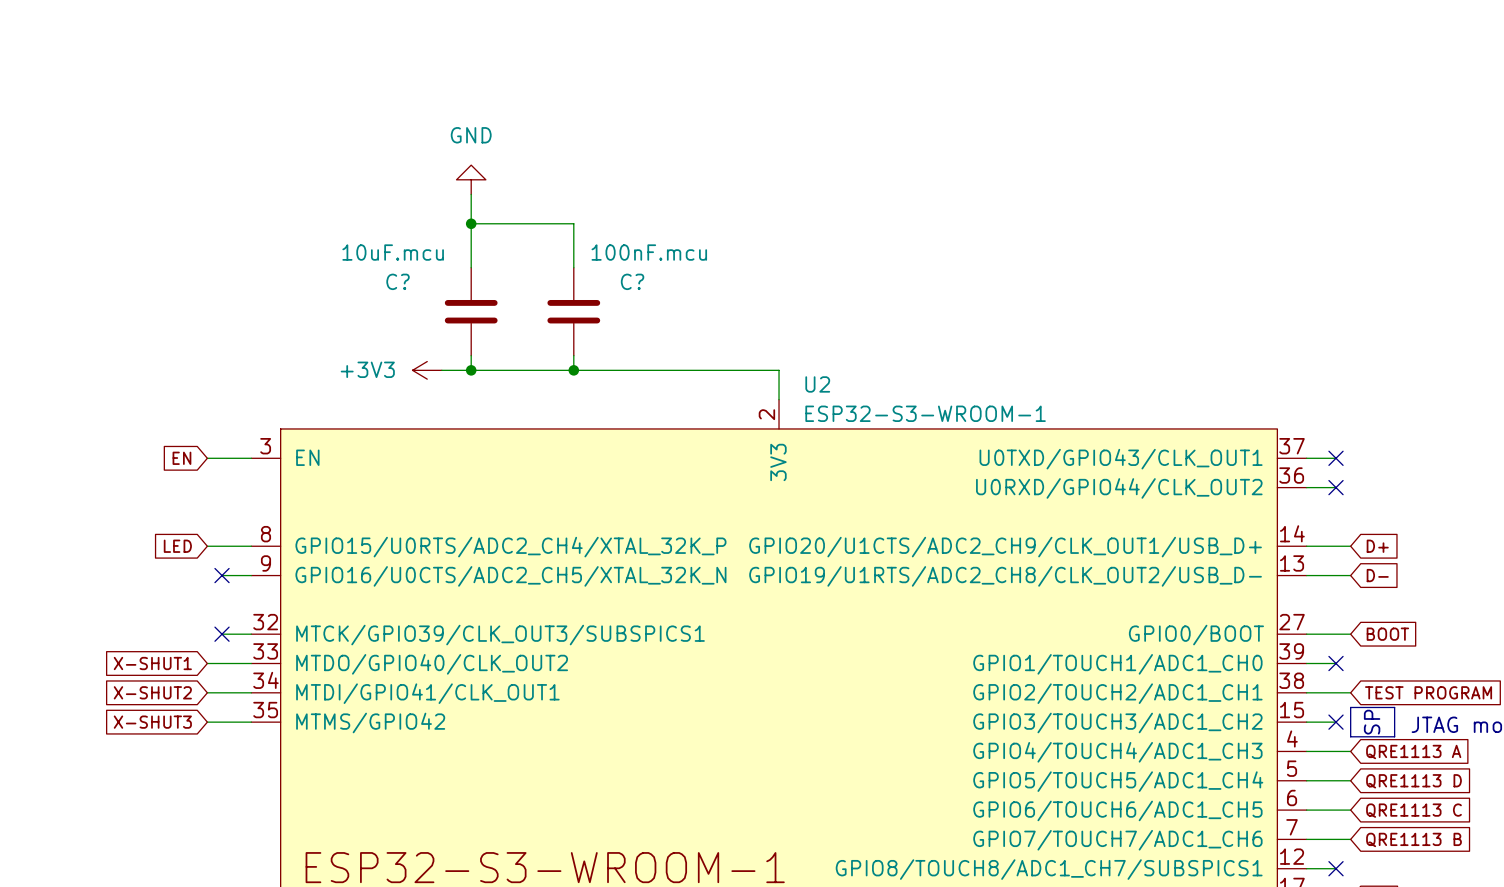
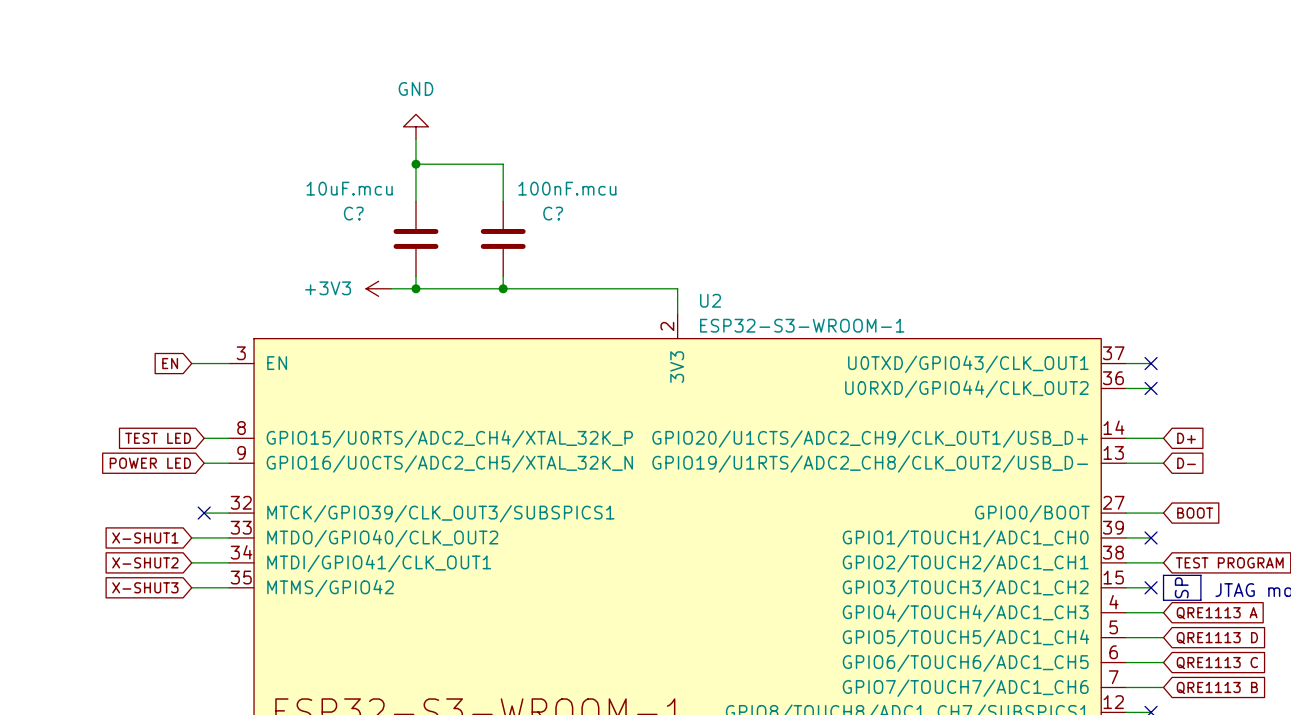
global label: none -> TEST LED (158, 438)
global label: LED (177, 546) -> none
wire: (207, 546) (222, 546) -> none
global label: none -> POWER LED (150, 463)
no-connect mark: (222, 575) -> none

